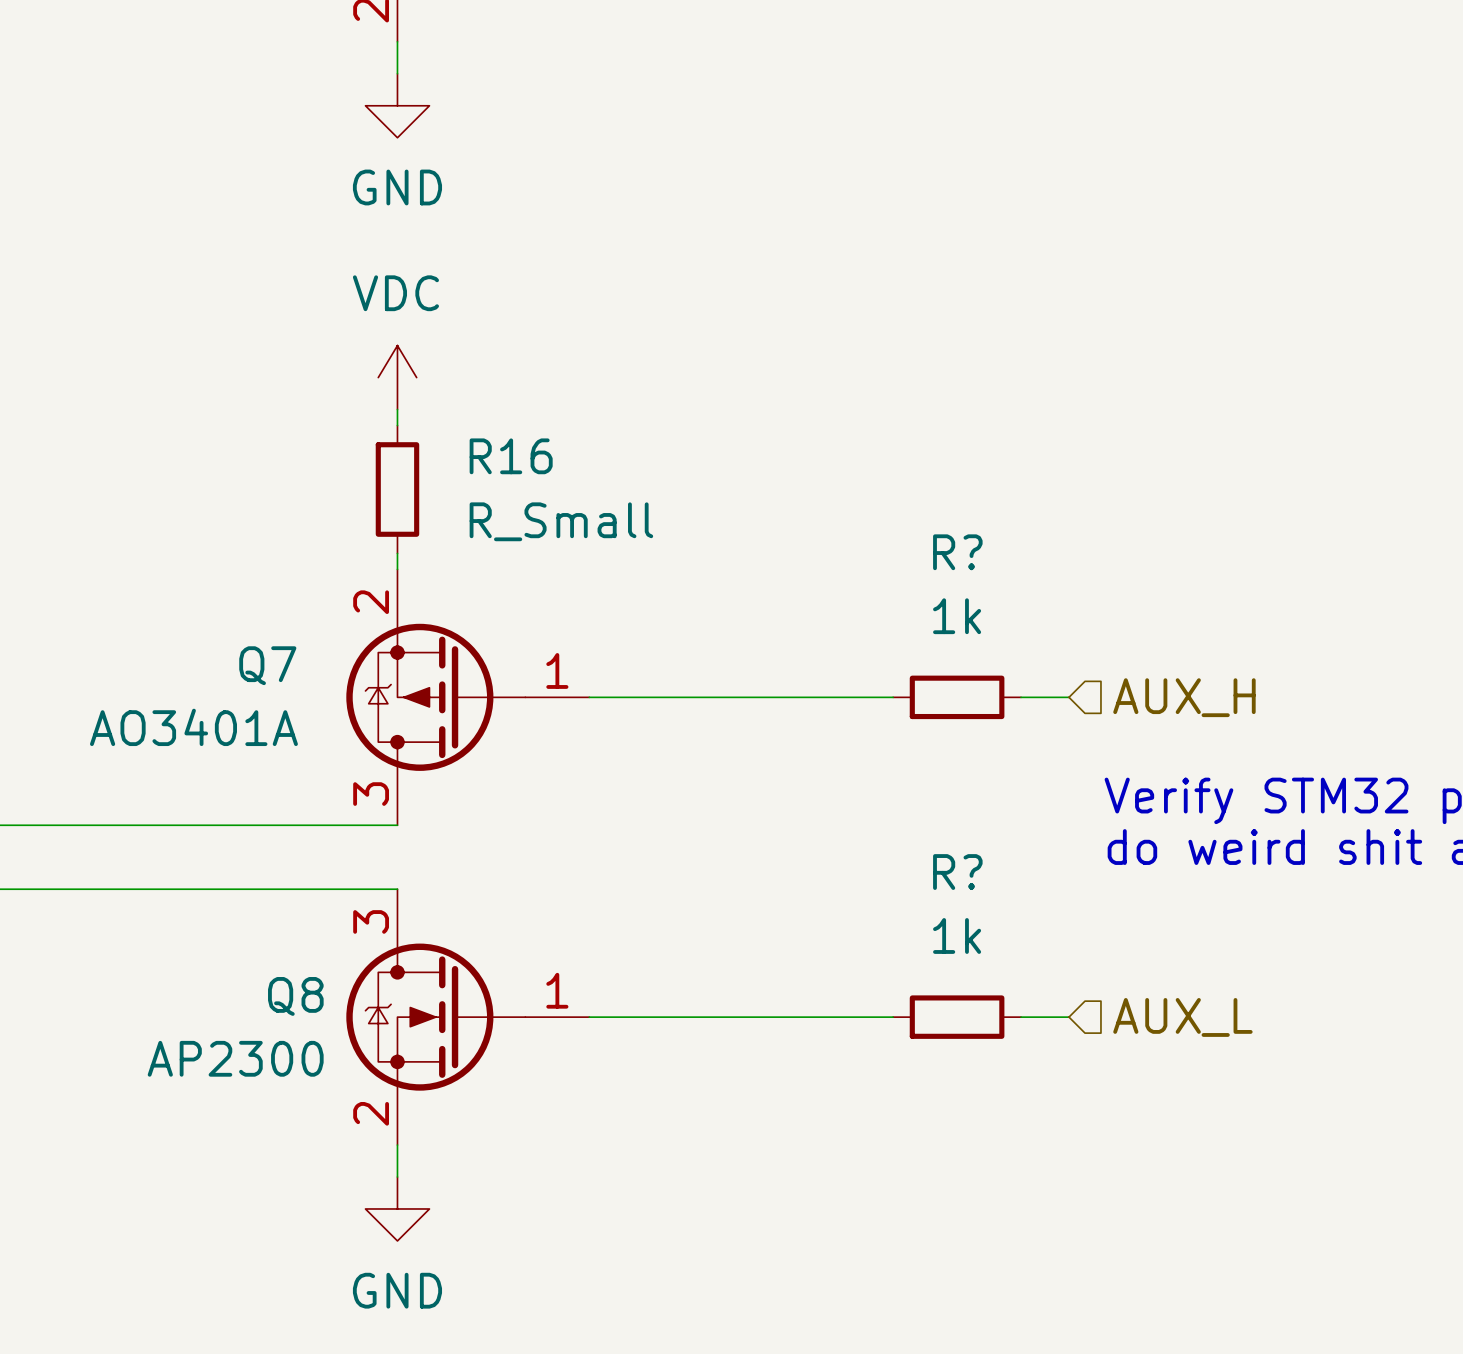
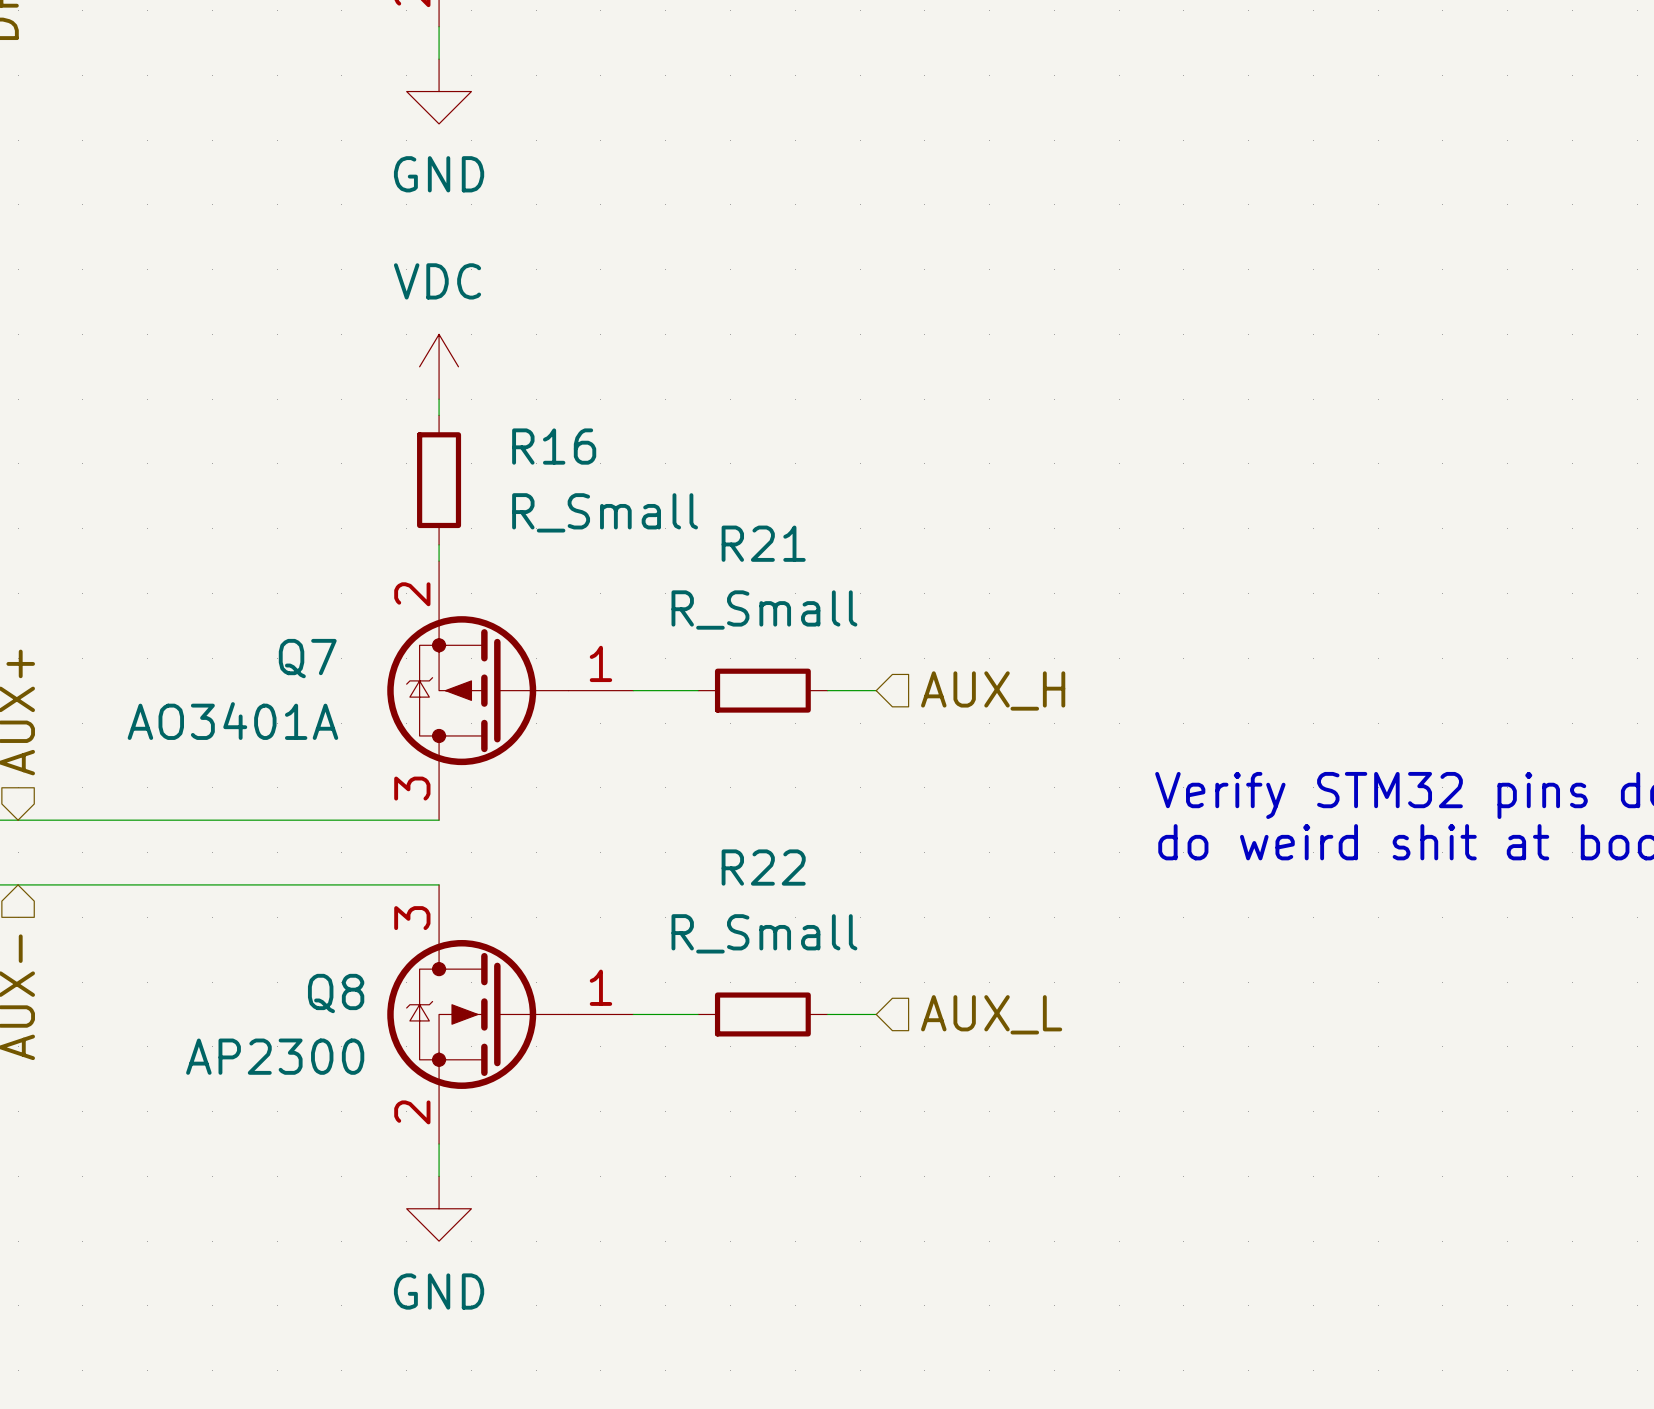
wire: (653, 697) (781, 697) -> none
R21: none -> R_Small (762, 690)
wire: (829, 697) (893, 697) -> none
R?: 1k (957, 697) -> none
wire: (1021, 697) (1068, 697) -> none
hierarchical label position: AUX_H (1184, 697) -> AUX_H (993, 690)
wire: (653, 1017) (781, 1017) -> none
R22: none -> R_Small (762, 1014)
wire: (829, 1017) (893, 1017) -> none
R?: 1k (957, 1017) -> none
wire: (1021, 1017) (1068, 1017) -> none
hierarchical label position: AUX_L (1182, 1017) -> AUX_L (991, 1014)

